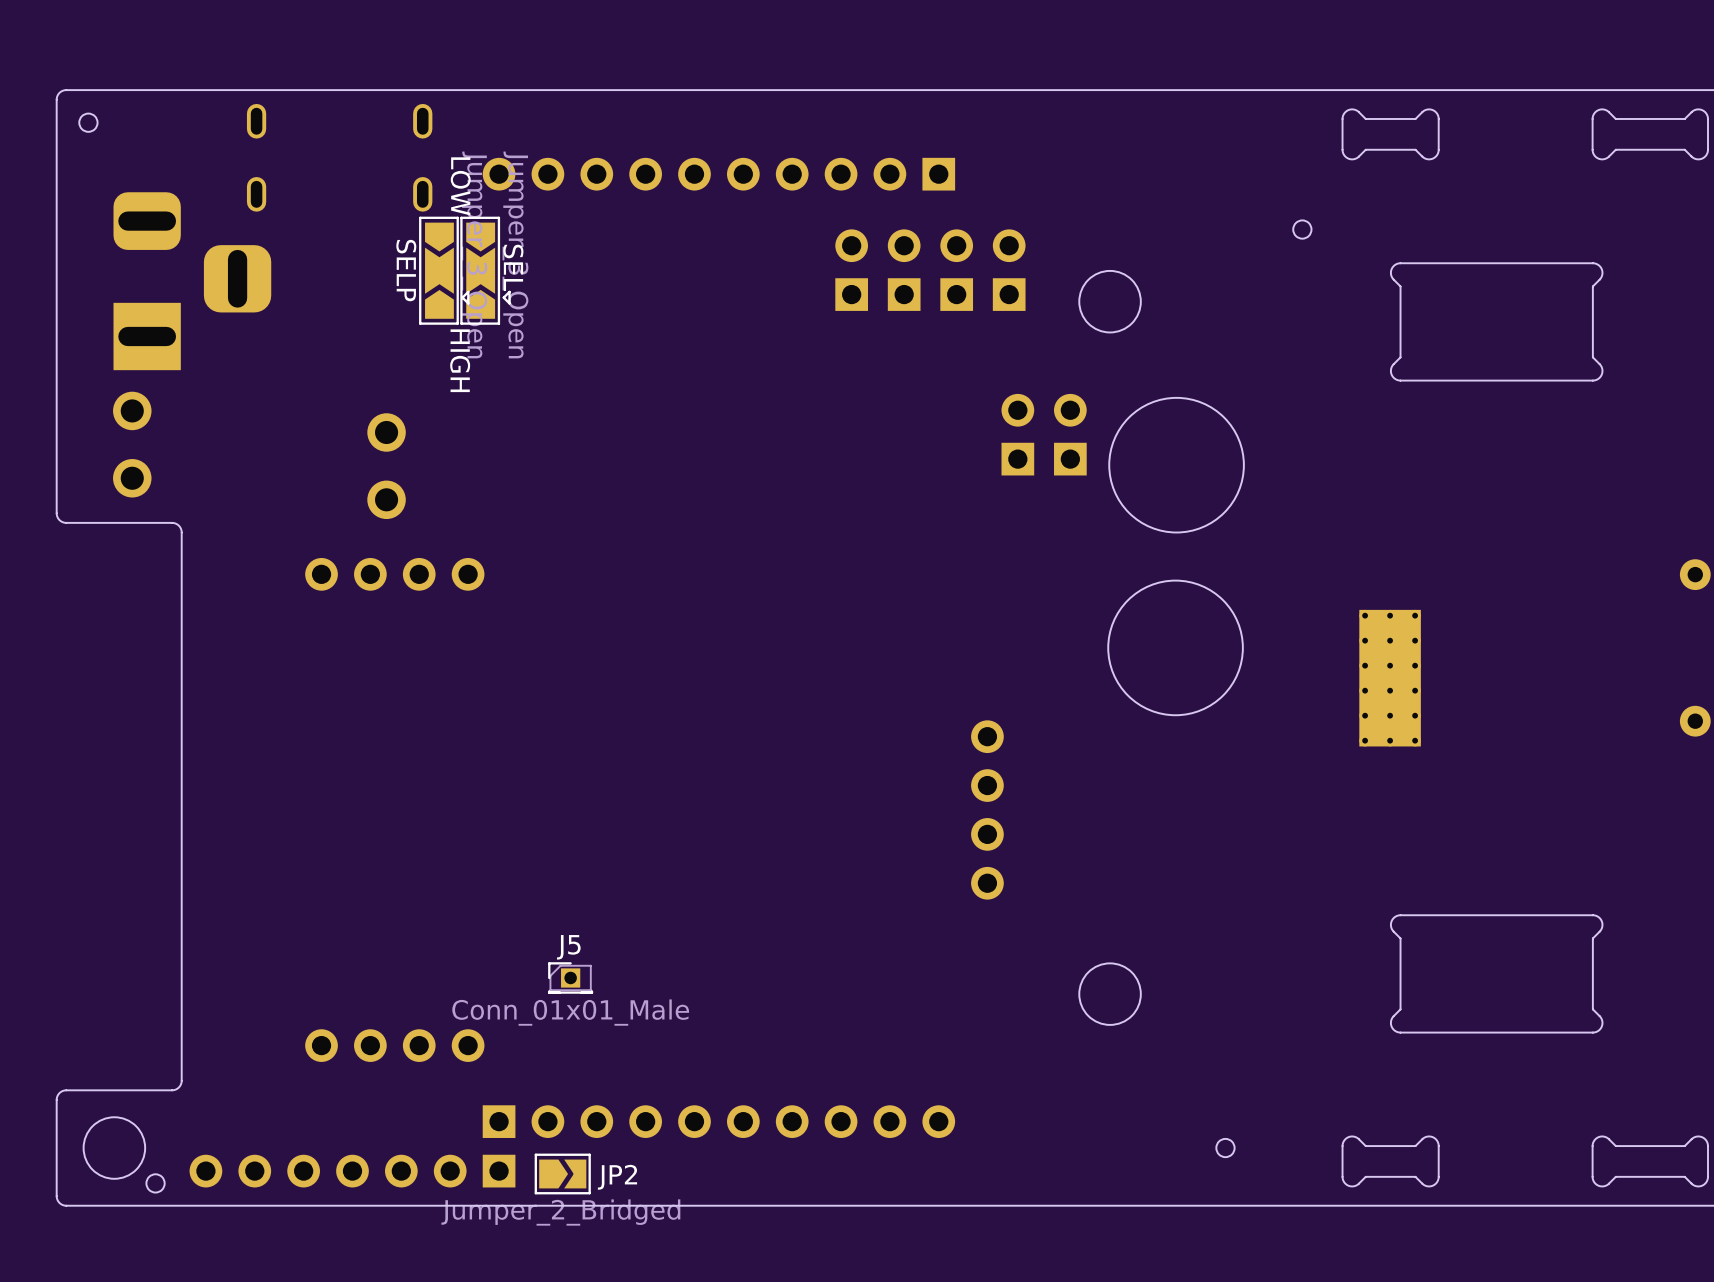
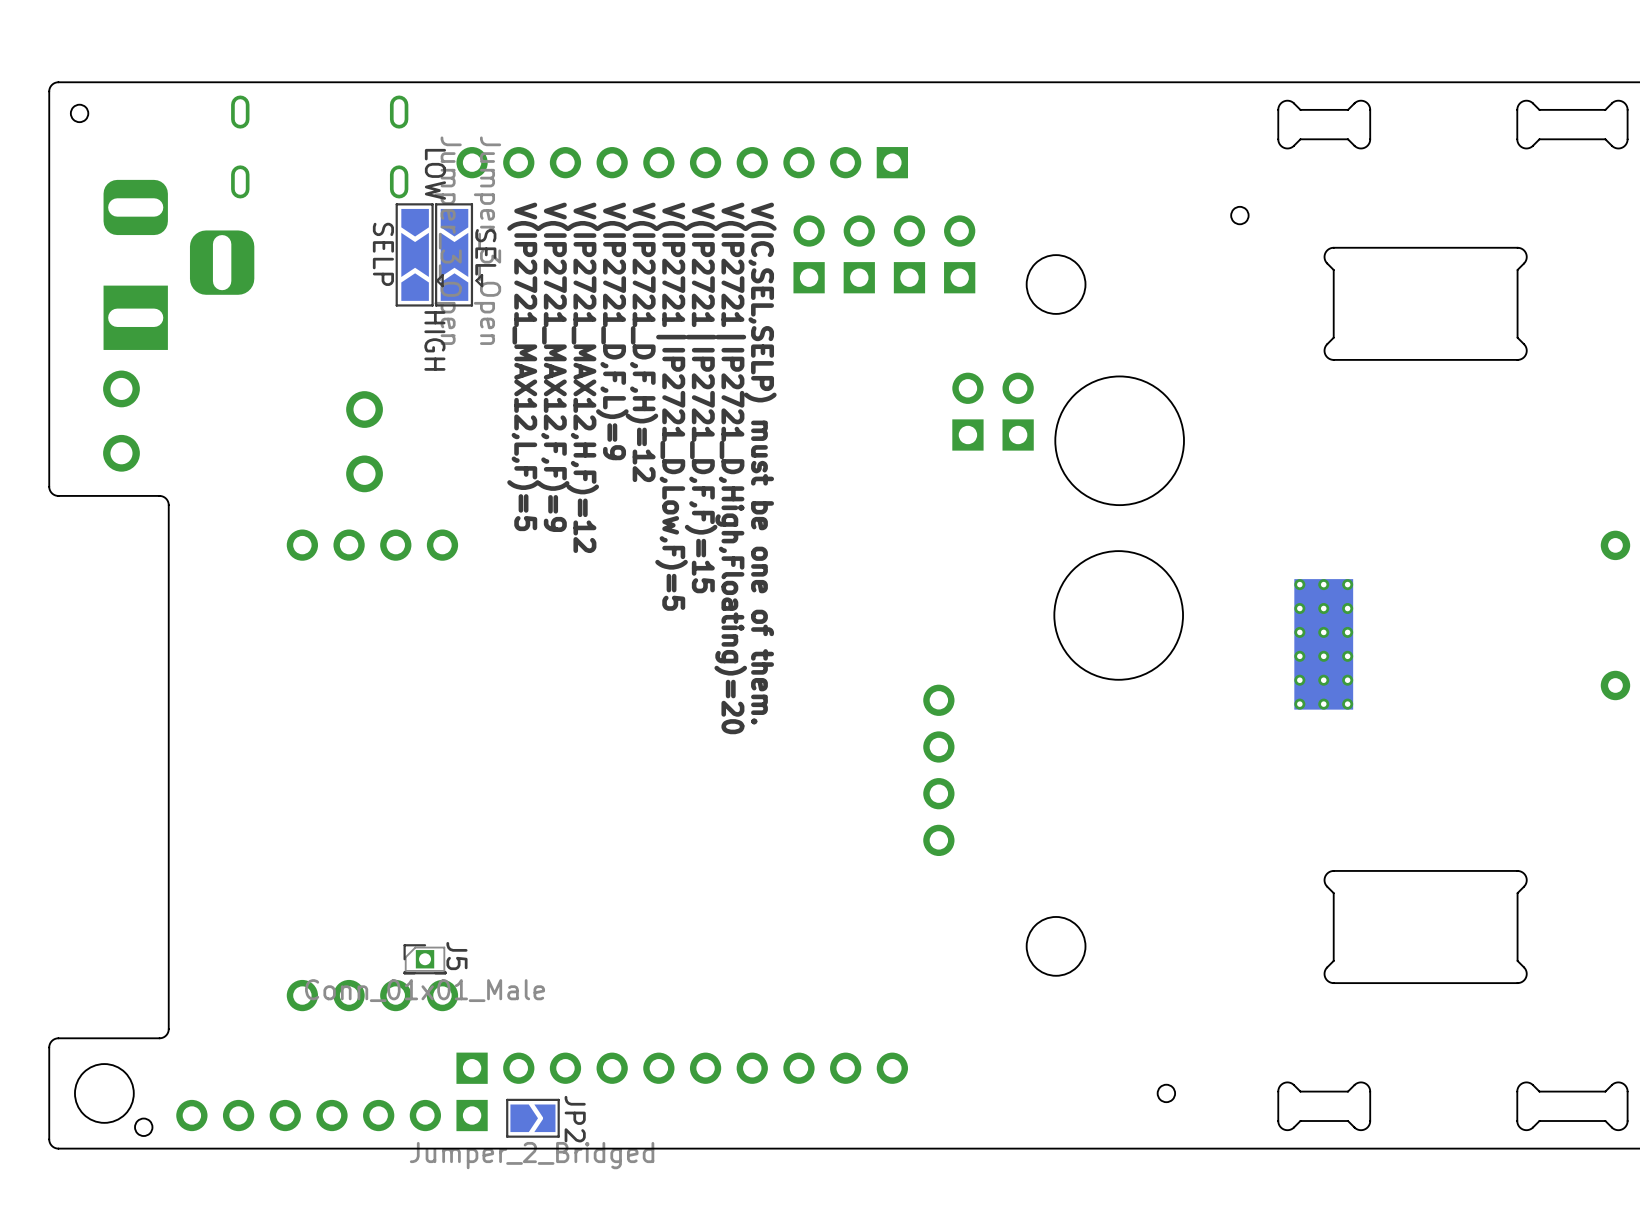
text: none -> V(IP2721_D,F,L)=9 (612, 331)
text: none -> V(IP2721_D,F,H)=12 (641, 342)
text: none -> V(IP2721_MAX12,L,F)=5 (523, 366)
text: none -> V(IP2721_MAX12,F,F)=9 (553, 367)
text: none -> V(IP2721_MAX12,H,F)=12 (582, 377)
text: none -> V(IP2721|IP2721_D,F,F)=15 (701, 397)
text: none -> V(IP2721|IP2721_D,Low,F)=5 (671, 406)
text: none -> V(IC,SEL,SELP) must be one of them. (760, 463)
text: none -> V(IP2721|IP2721_D,High,Floating)=20 (730, 468)
J5 name rotation: 0° (568, 947) -> 90° clockwise (456, 956)
J5 position: (570, 977) -> (425, 959)
JP2 name rotation: 0° (617, 1177) -> 90° clockwise (575, 1119)

